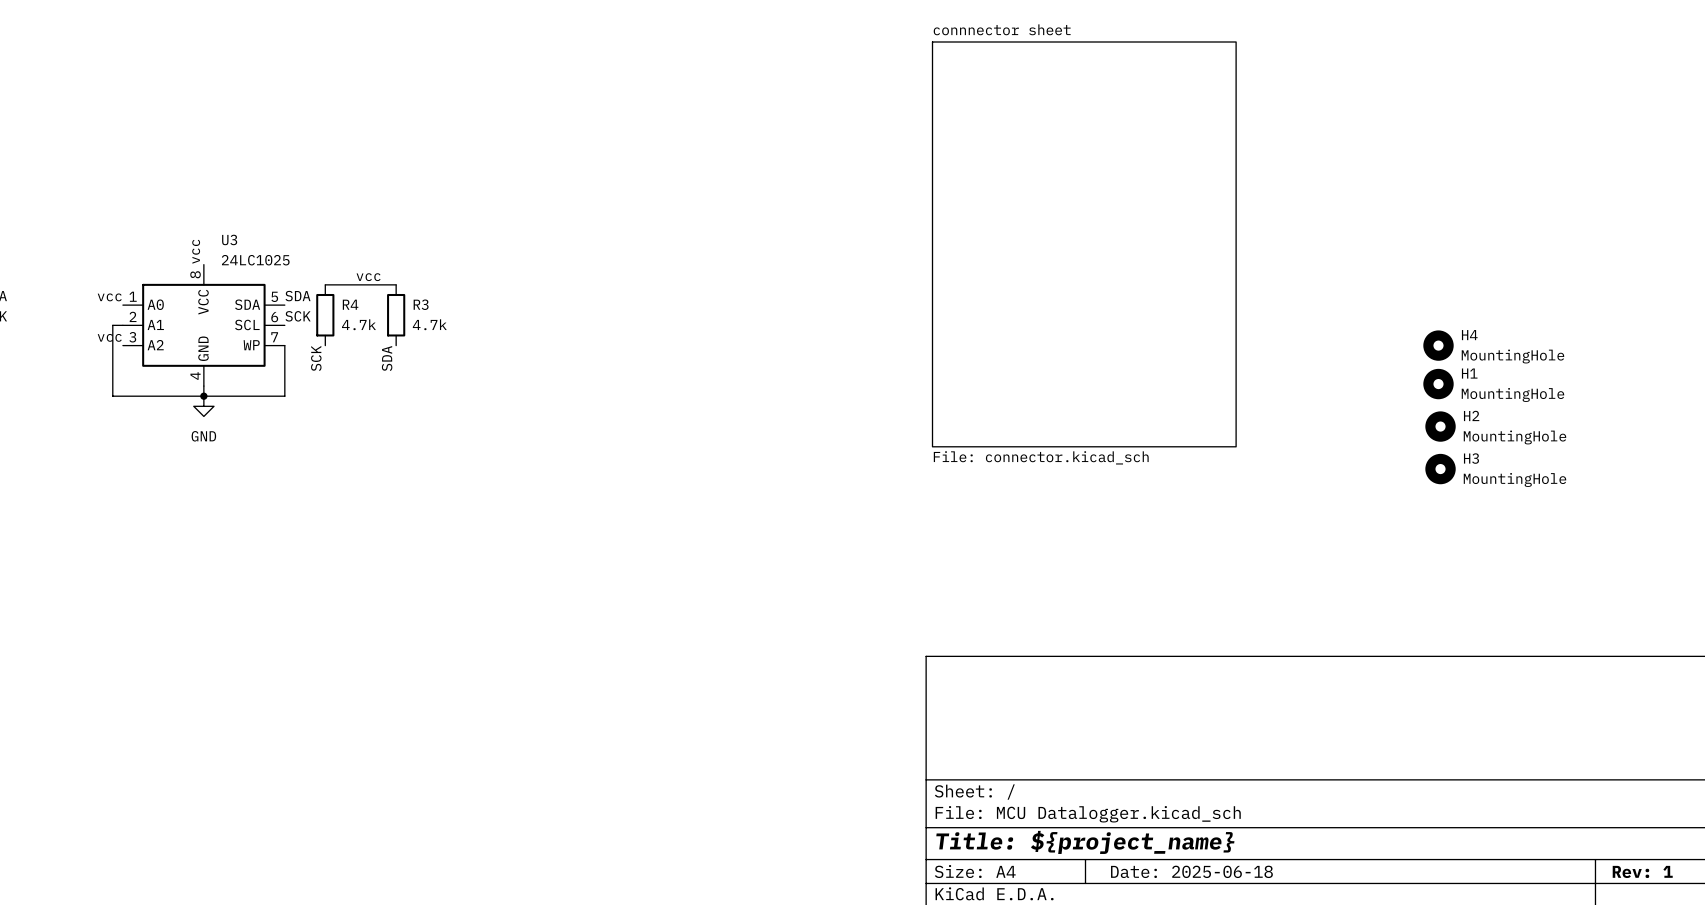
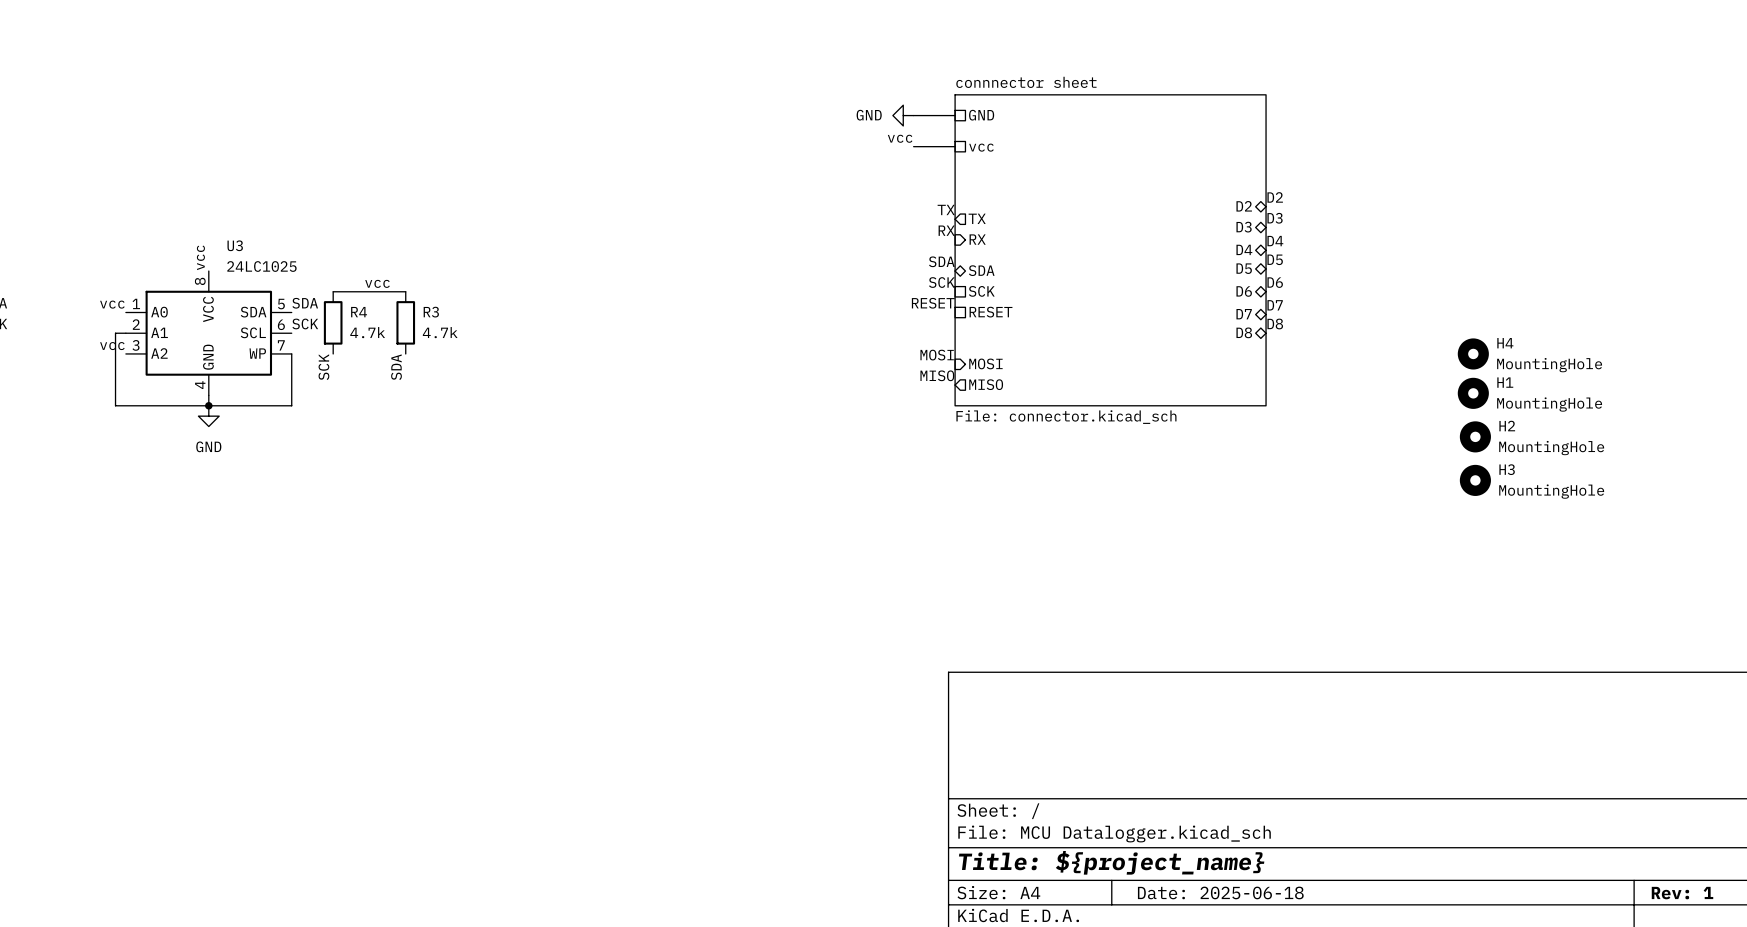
sheet connnector sheet name position: connnector sheet (1002, 29) -> connnector sheet (1026, 82)
sheet connnector sheet shape: [931, 41, 1237, 448] -> [954, 94, 1267, 407]
power symbol: none -> GND (903, 115)
wire: none -> (913, 115) (955, 115)
sheet pin: none -> GND (981, 115)
label: none -> vcc (900, 138)
wire: none -> (913, 146) (955, 146)
sheet pin: none -> vcc (981, 147)
label: none -> D2 (1275, 197)
sheet pin: none -> D2 (1244, 206)
label: none -> TX (946, 209)
sheet pin: none -> TX (977, 218)
label: none -> D3 (1275, 218)
sheet pin: none -> D3 (1244, 227)
label: none -> RX (946, 230)
sheet pin: none -> RX (977, 239)
label: none -> D4 (1275, 241)
sheet pin: none -> D4 (1244, 249)
label: none -> D5 (1275, 259)
label: none -> SDA (941, 261)
sheet pin: none -> D5 (1244, 268)
sheet pin: none -> SDA (981, 270)
label: none -> SCK (941, 282)
label: none -> D6 (1275, 282)
sheet pin: none -> SCK (981, 291)
sheet pin: none -> D6 (1244, 291)
label: none -> RESET (933, 303)
label: none -> D7 (1275, 305)
sheet pin: none -> RESET (991, 312)
sheet pin: none -> D7 (1244, 314)
label: none -> D8 (1275, 323)
sheet pin: none -> D8 (1244, 332)
label: none -> MOSI (937, 355)
sheet pin: none -> MOSI (985, 363)
label: none -> MISO (937, 375)
sheet pin: none -> MISO (986, 384)
sheet connnector sheet value position: File: connector.kicad_sch (1041, 457) -> File: connector.kicad_sch (1066, 417)

